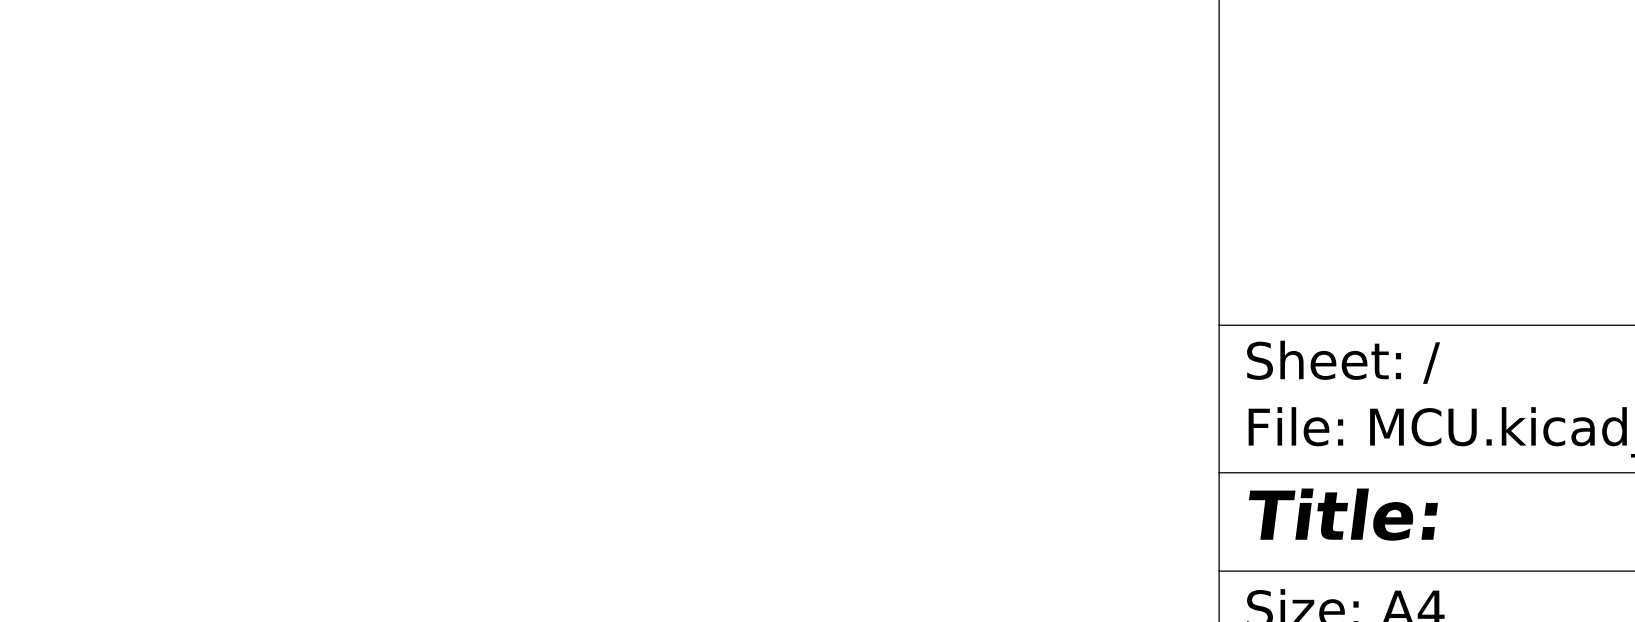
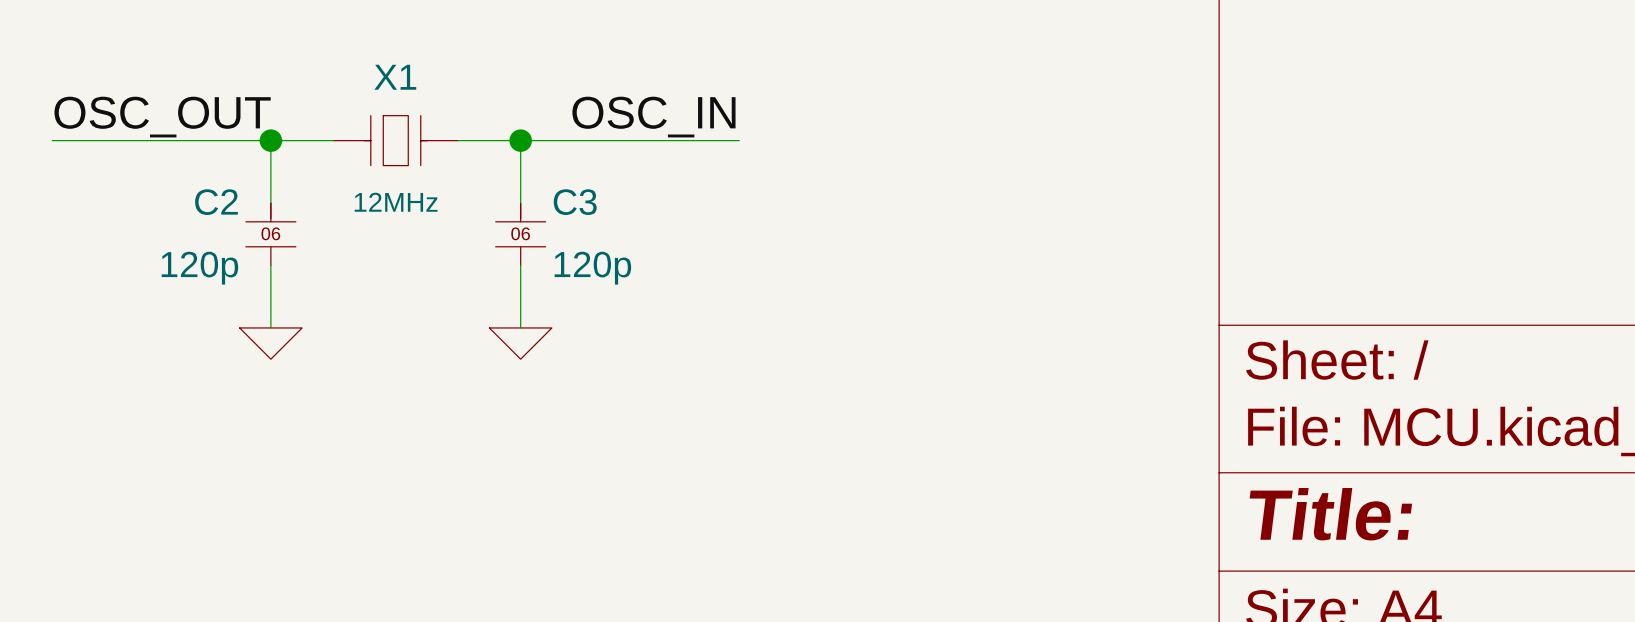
label: none -> OSC_OUT (162, 117)
label: none -> OSC_IN (653, 117)
wire: none -> (52, 140) (333, 140)
wire: none -> (270, 140) (270, 203)
junction: none -> (270, 140)
X1: none -> (395, 140)
wire: none -> (458, 140) (739, 140)
wire: none -> (520, 140) (520, 203)
junction: none -> (520, 140)
C2: none -> (270, 234)
C3: none -> (520, 234)
wire: none -> (270, 265) (270, 327)
wire: none -> (520, 265) (520, 327)
power symbol: none -> (270, 343)
power symbol: none -> (520, 343)

